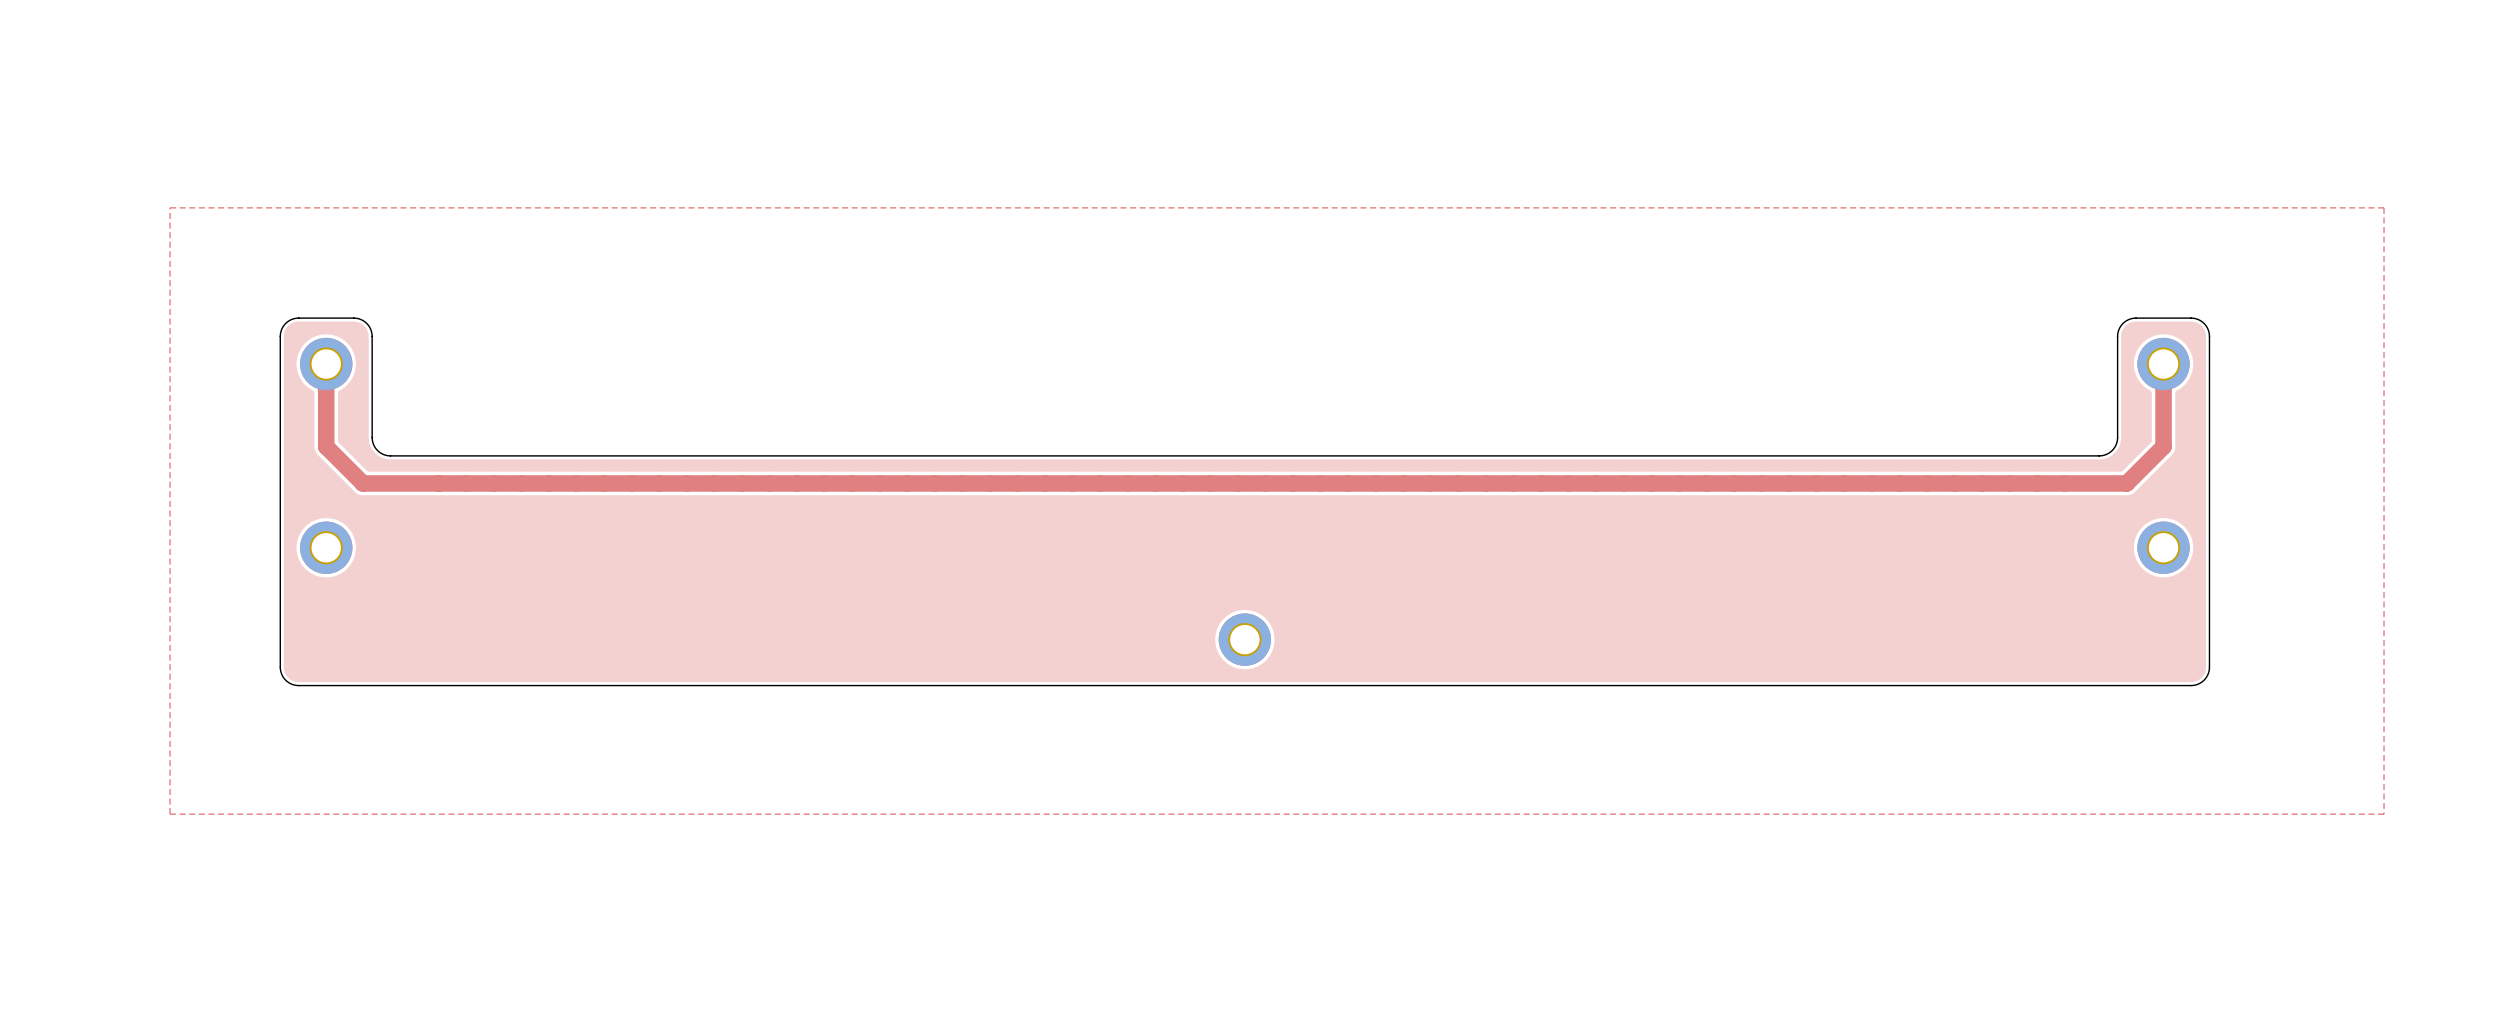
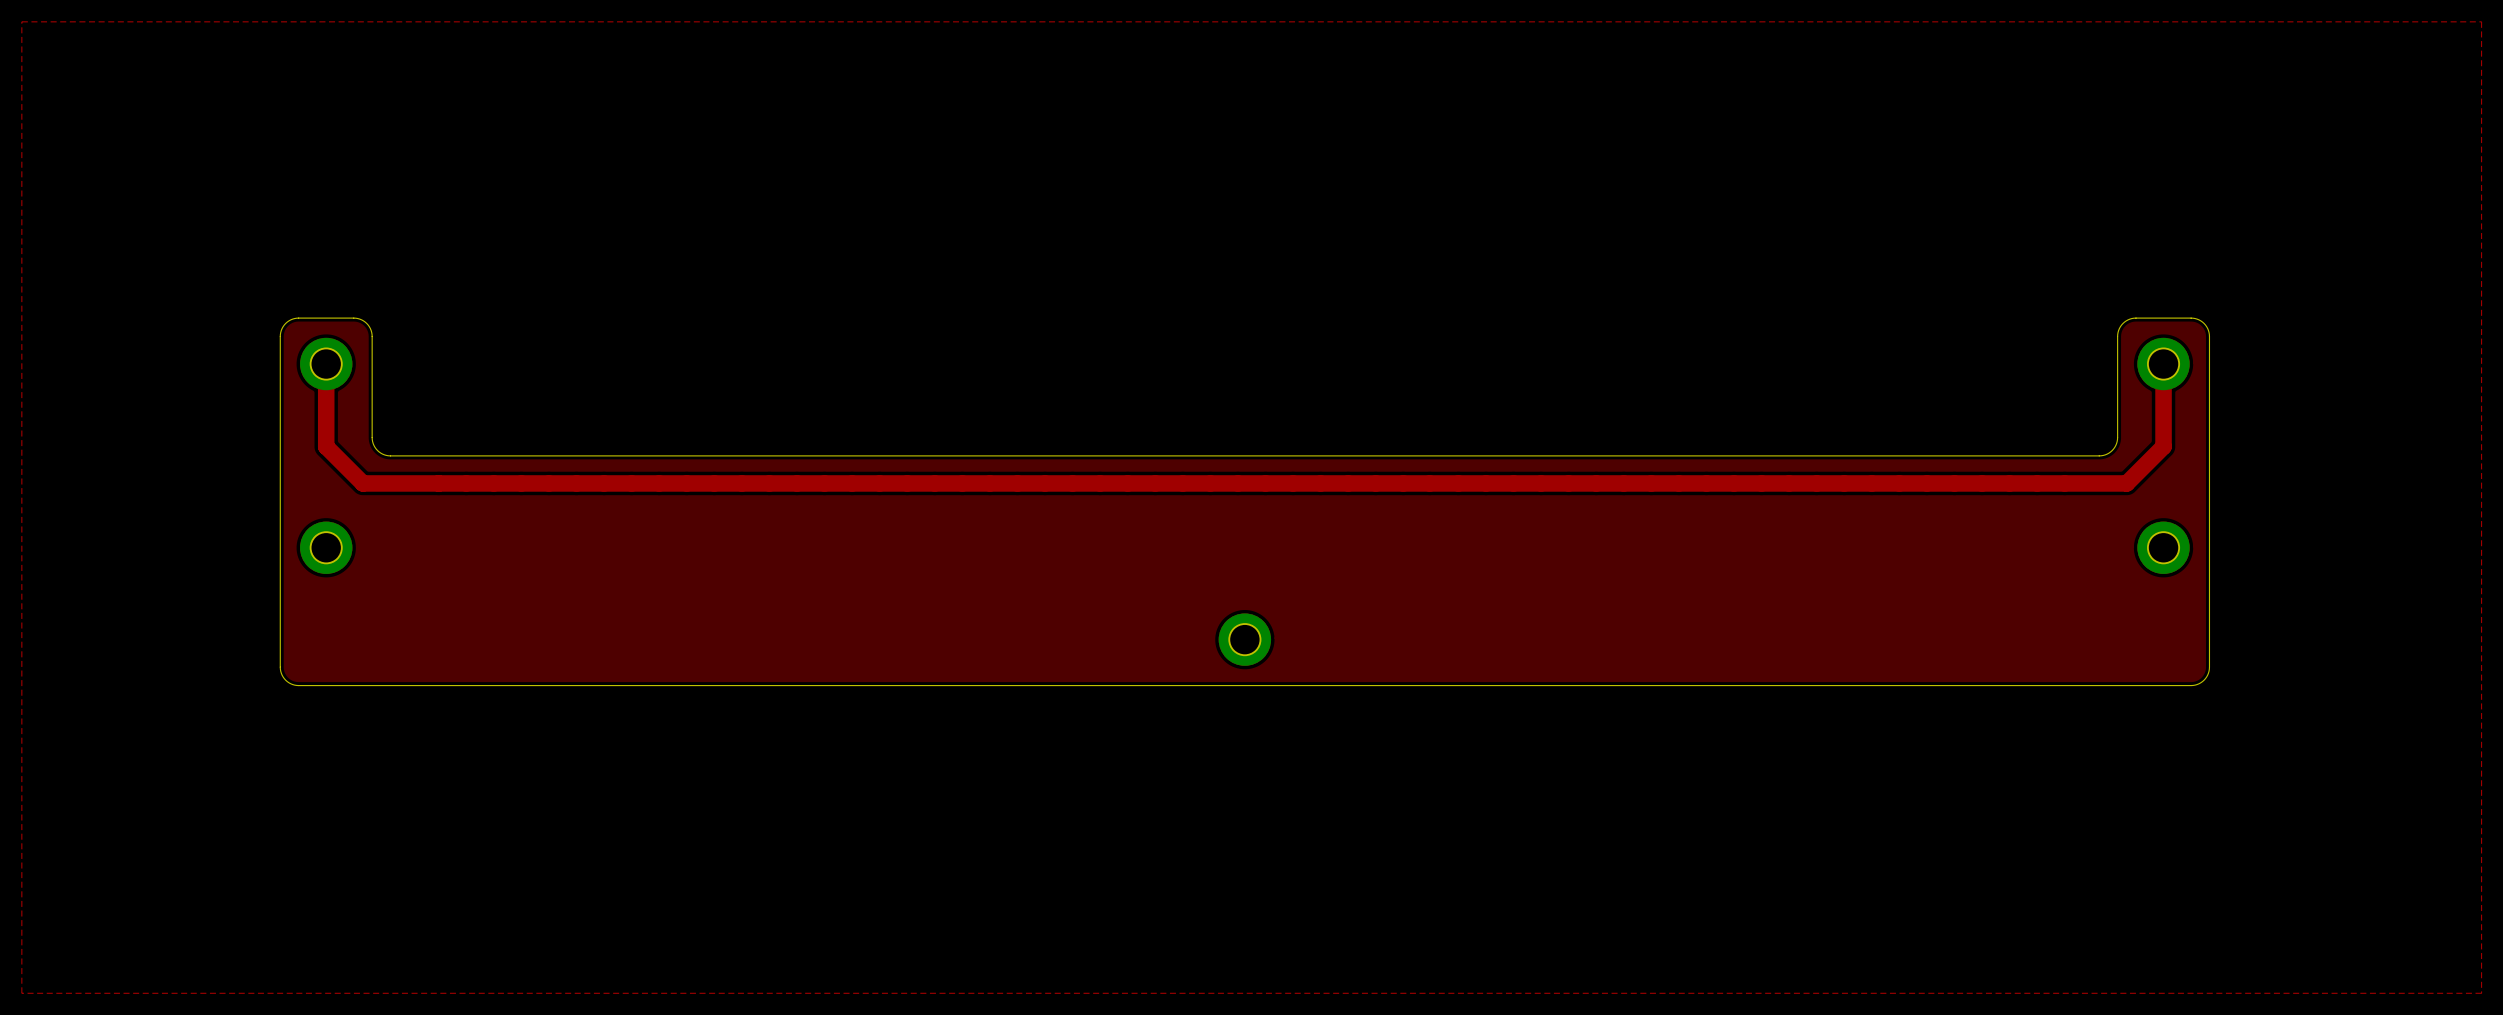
top zone outline: (2384, 207) (2384, 814) (170, 814) (170, 207) (2384, 207) -> (2481, 21) (2481, 993) (21, 993) (21, 21) (2481, 21)

